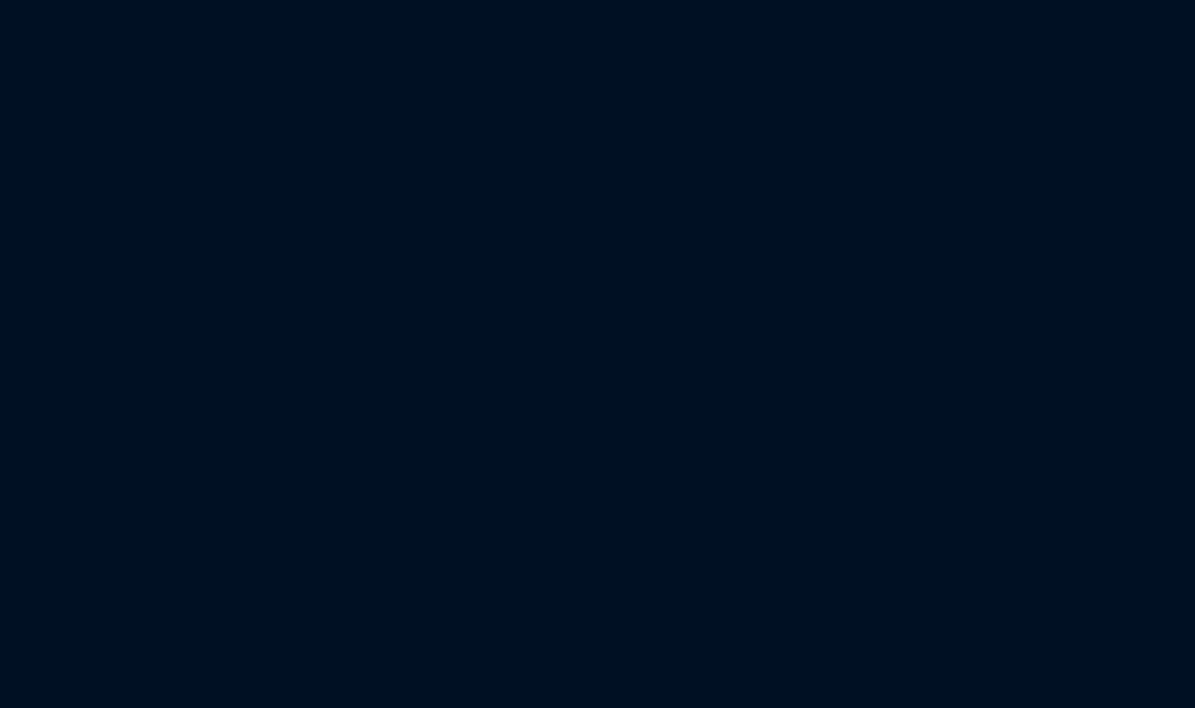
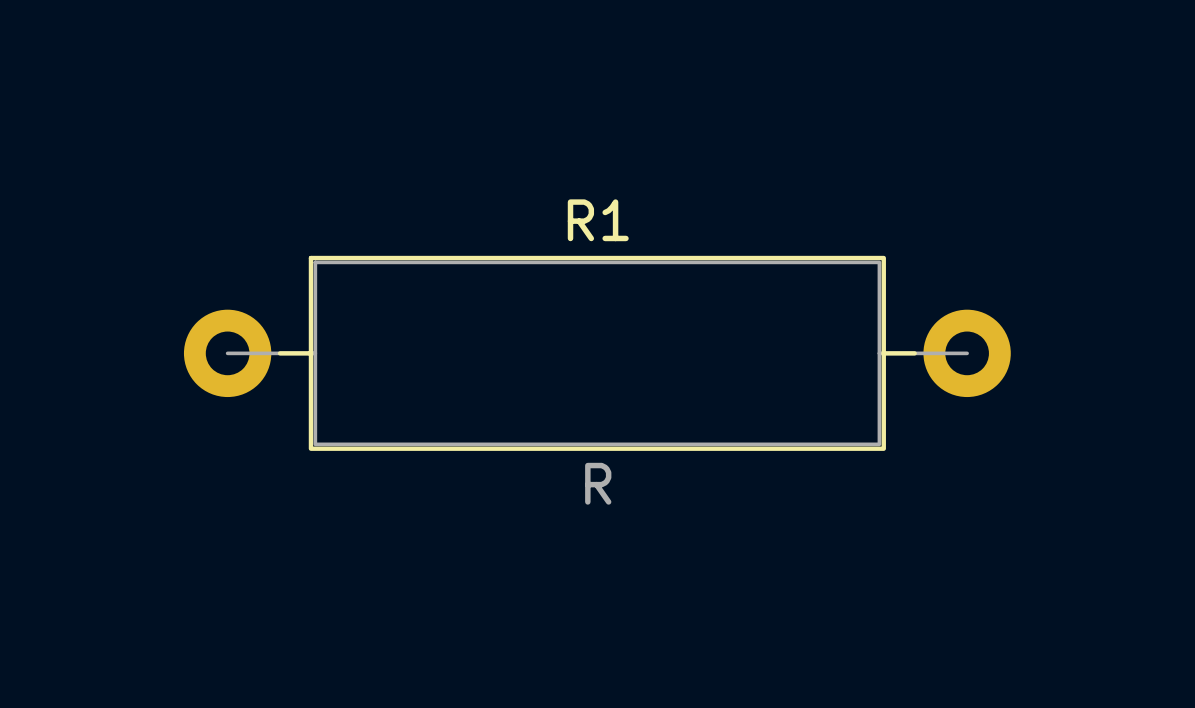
R1: none -> R (597, 353)

